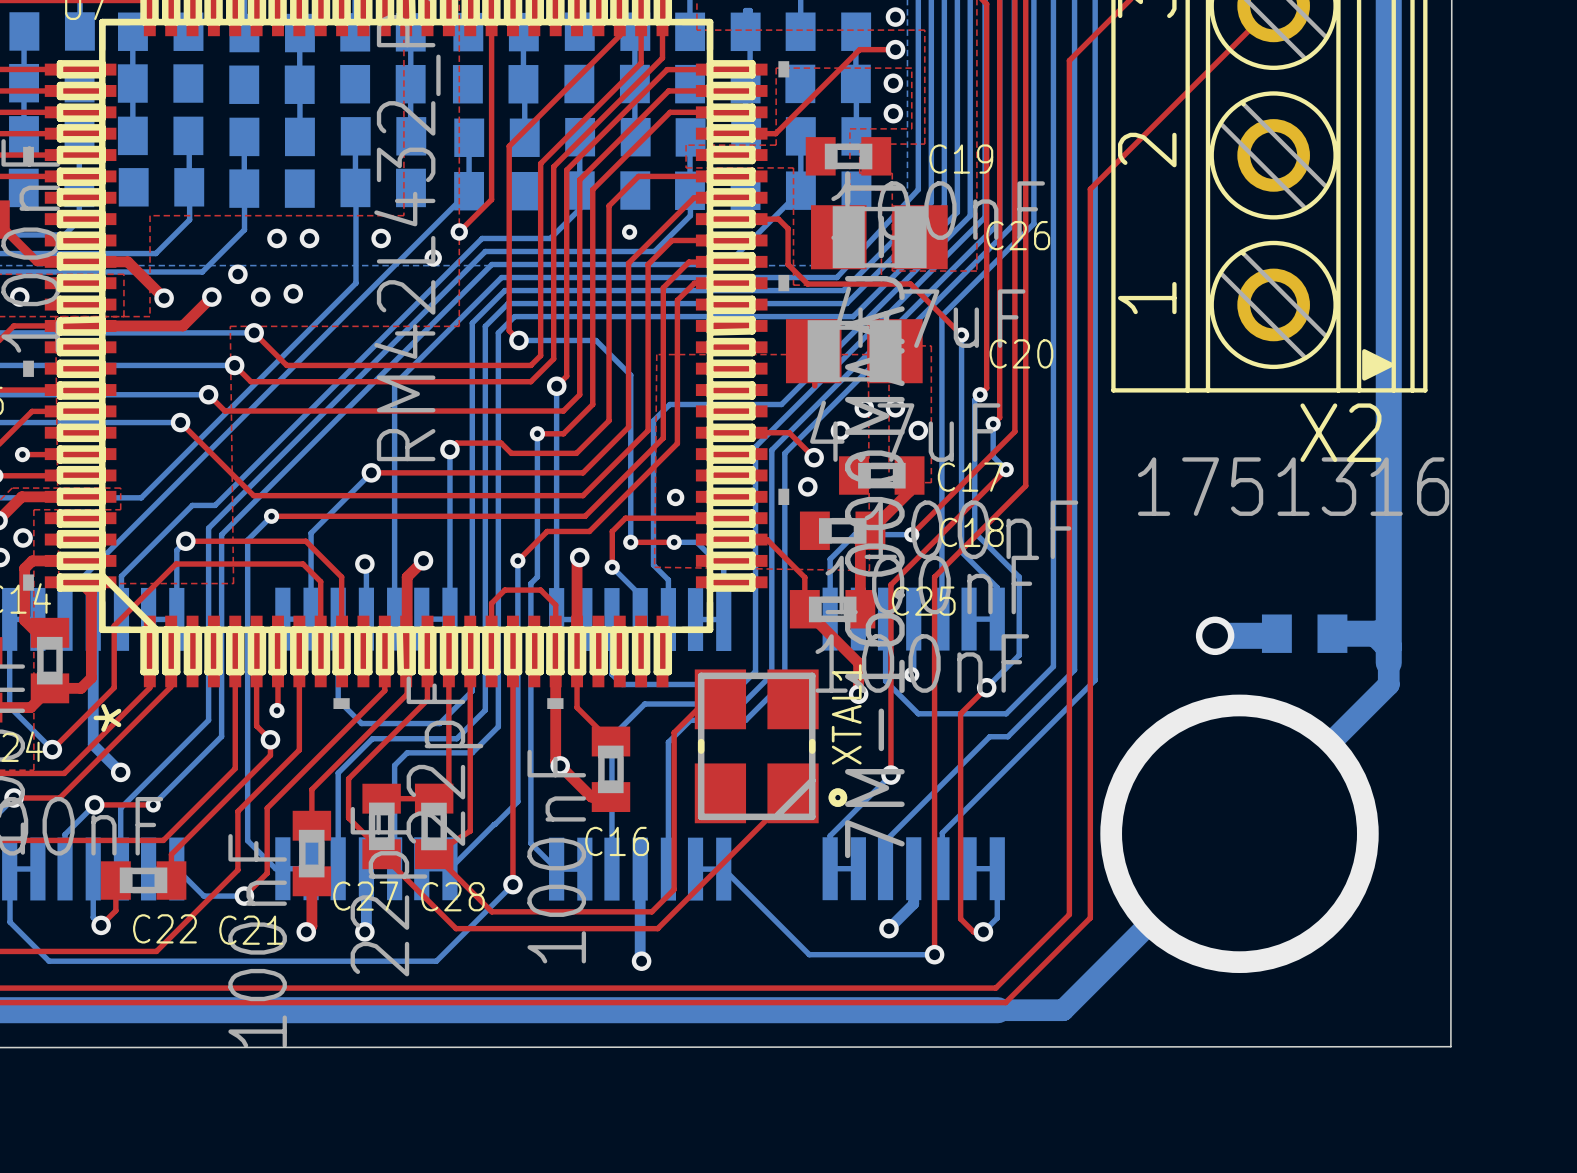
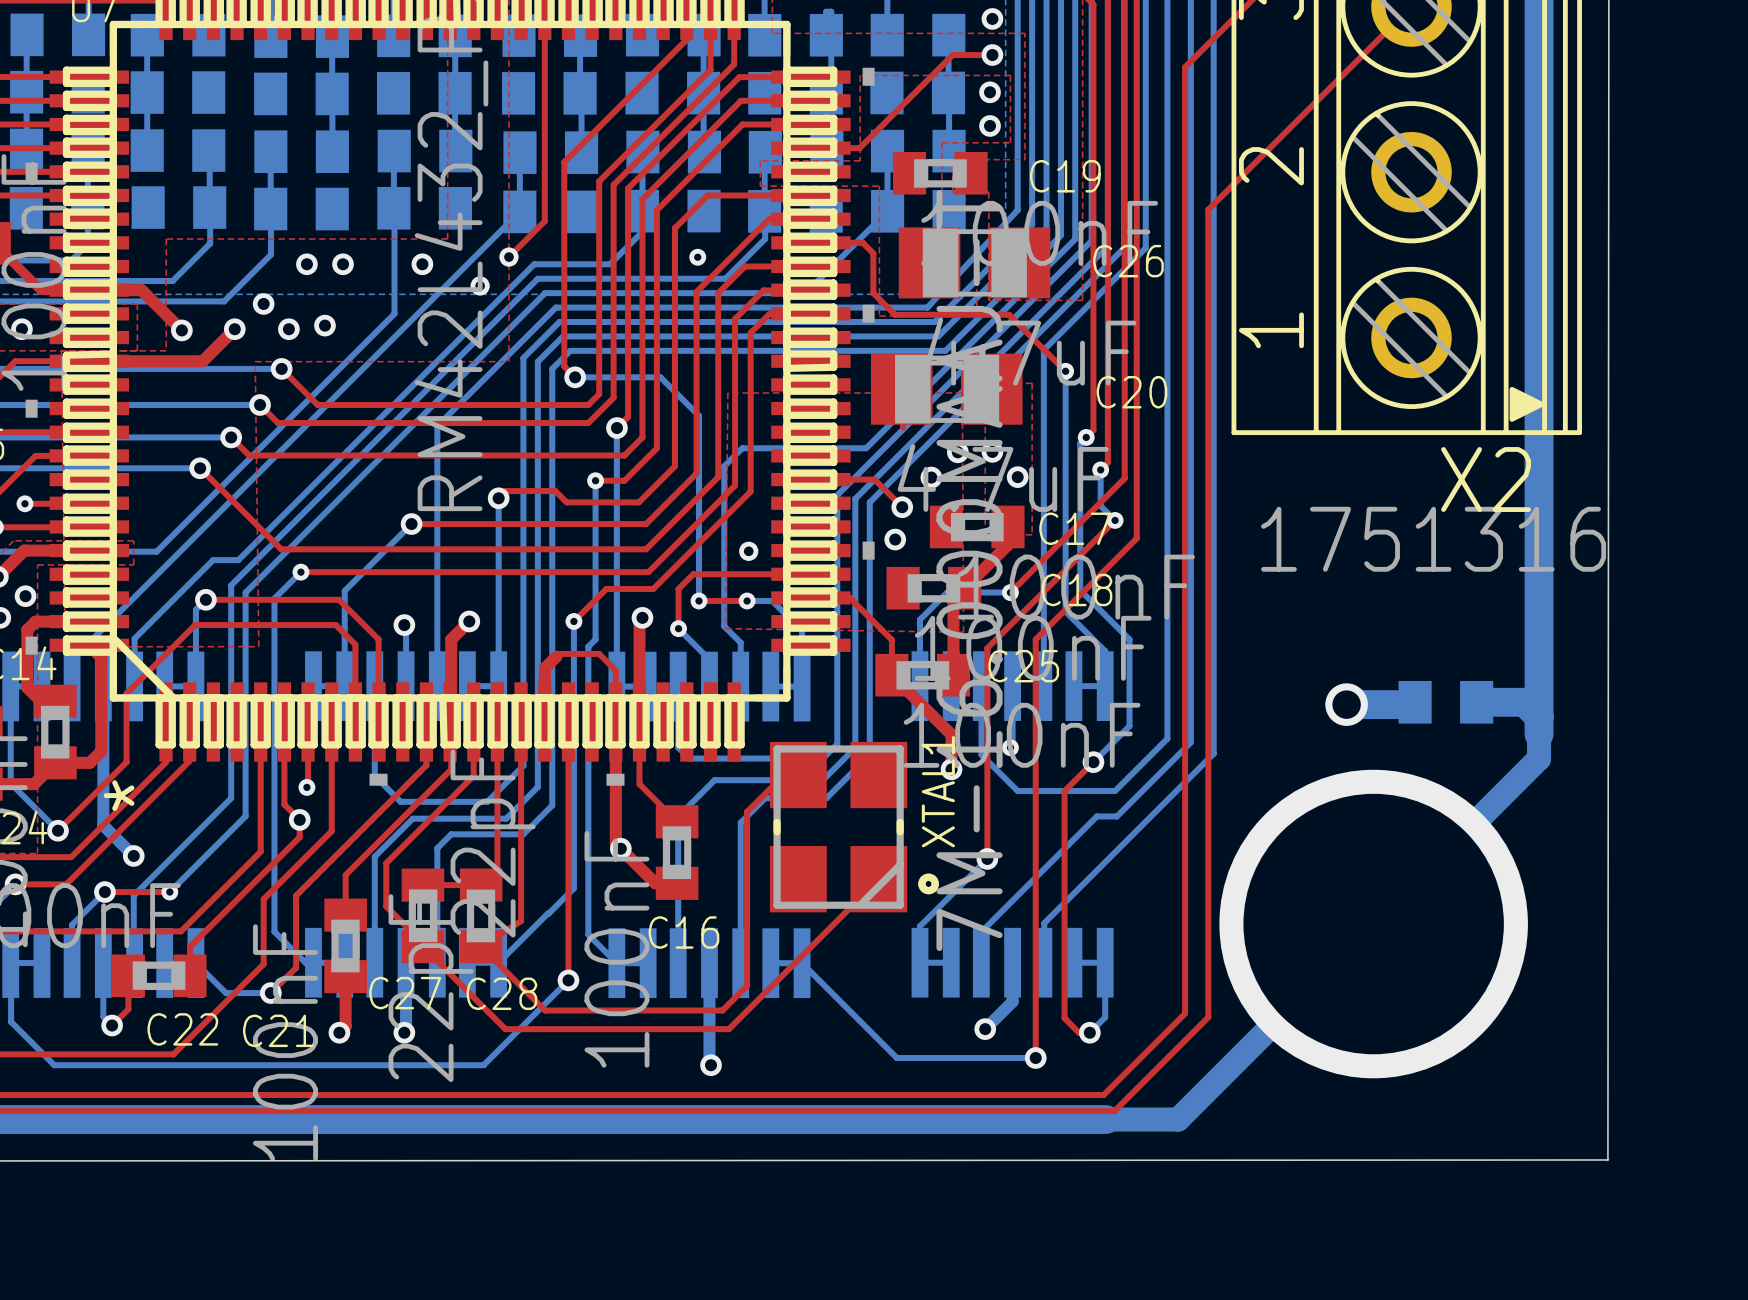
top track width: thin (504, 590) (491, 603) (491, 651) -> thick (559, 653) (544, 668) (544, 722)

